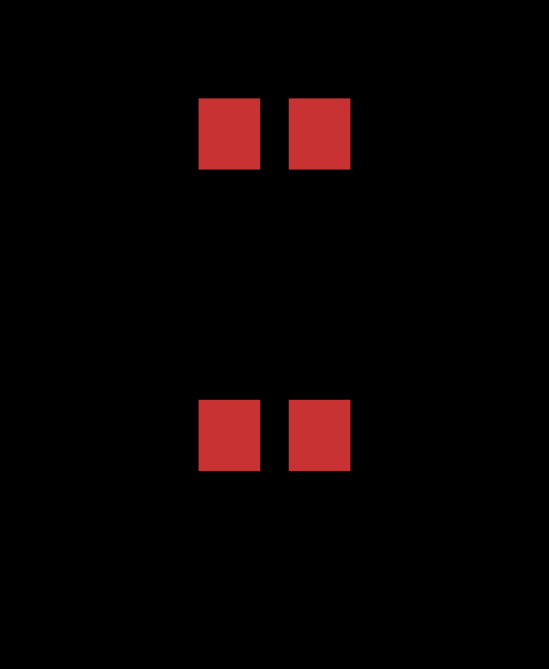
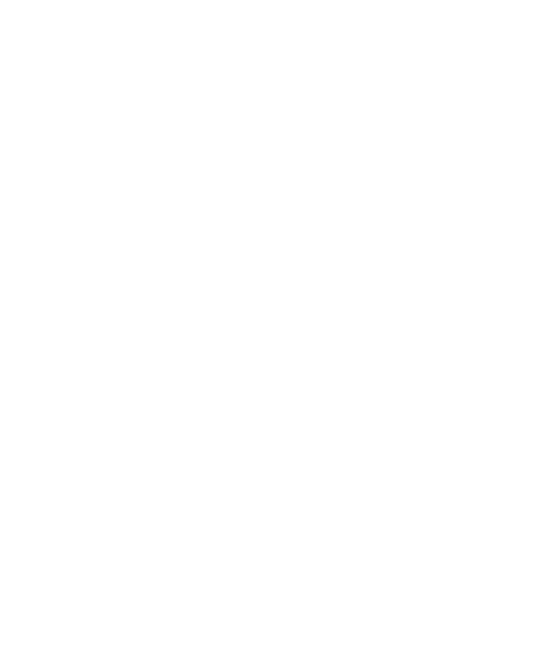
part: (274, 133) -> none
part: (274, 435) -> none

